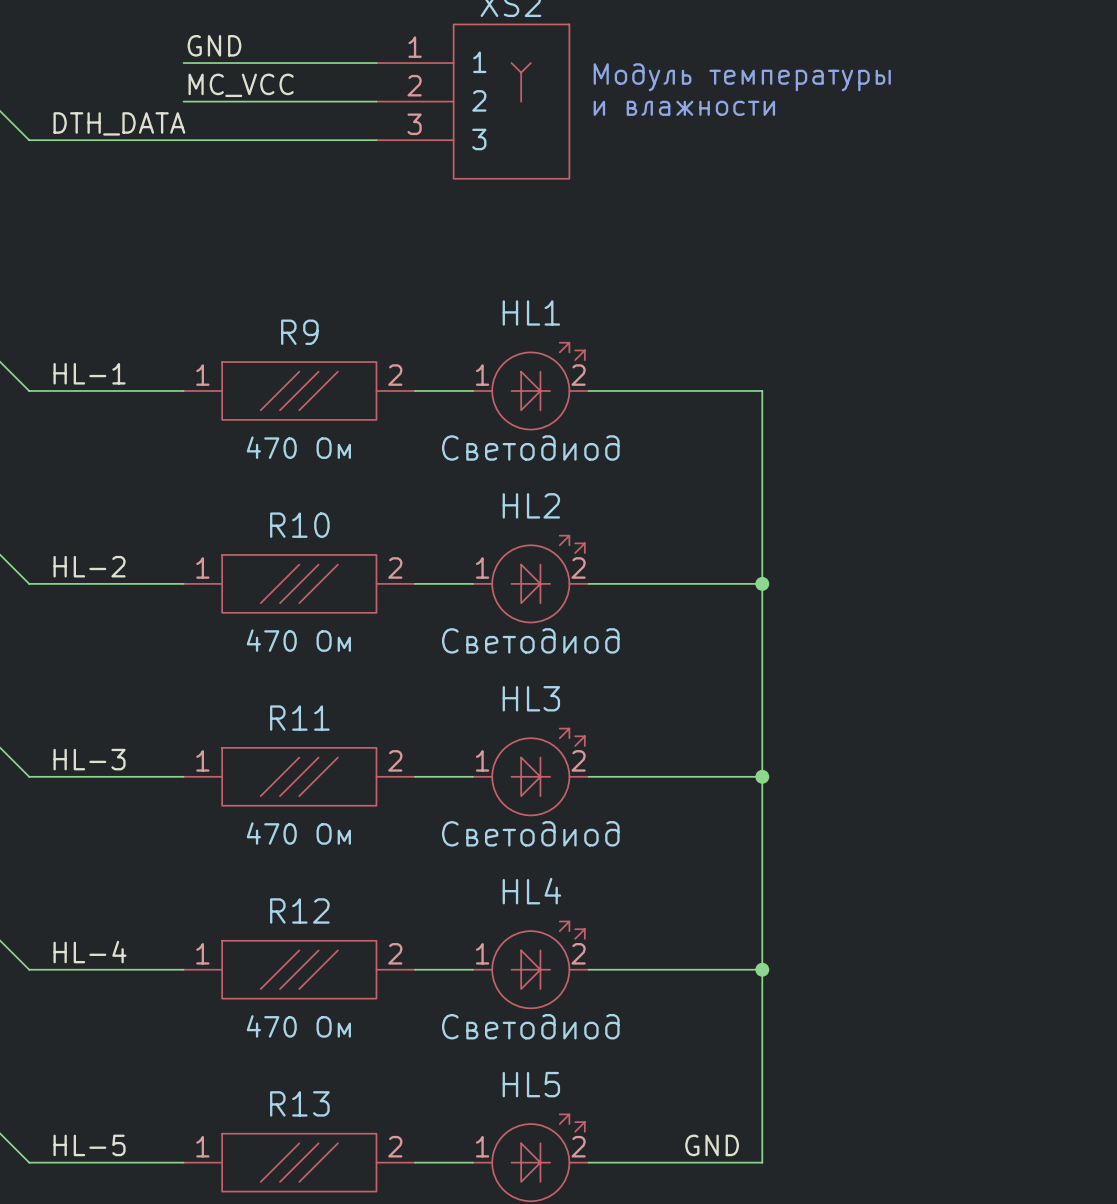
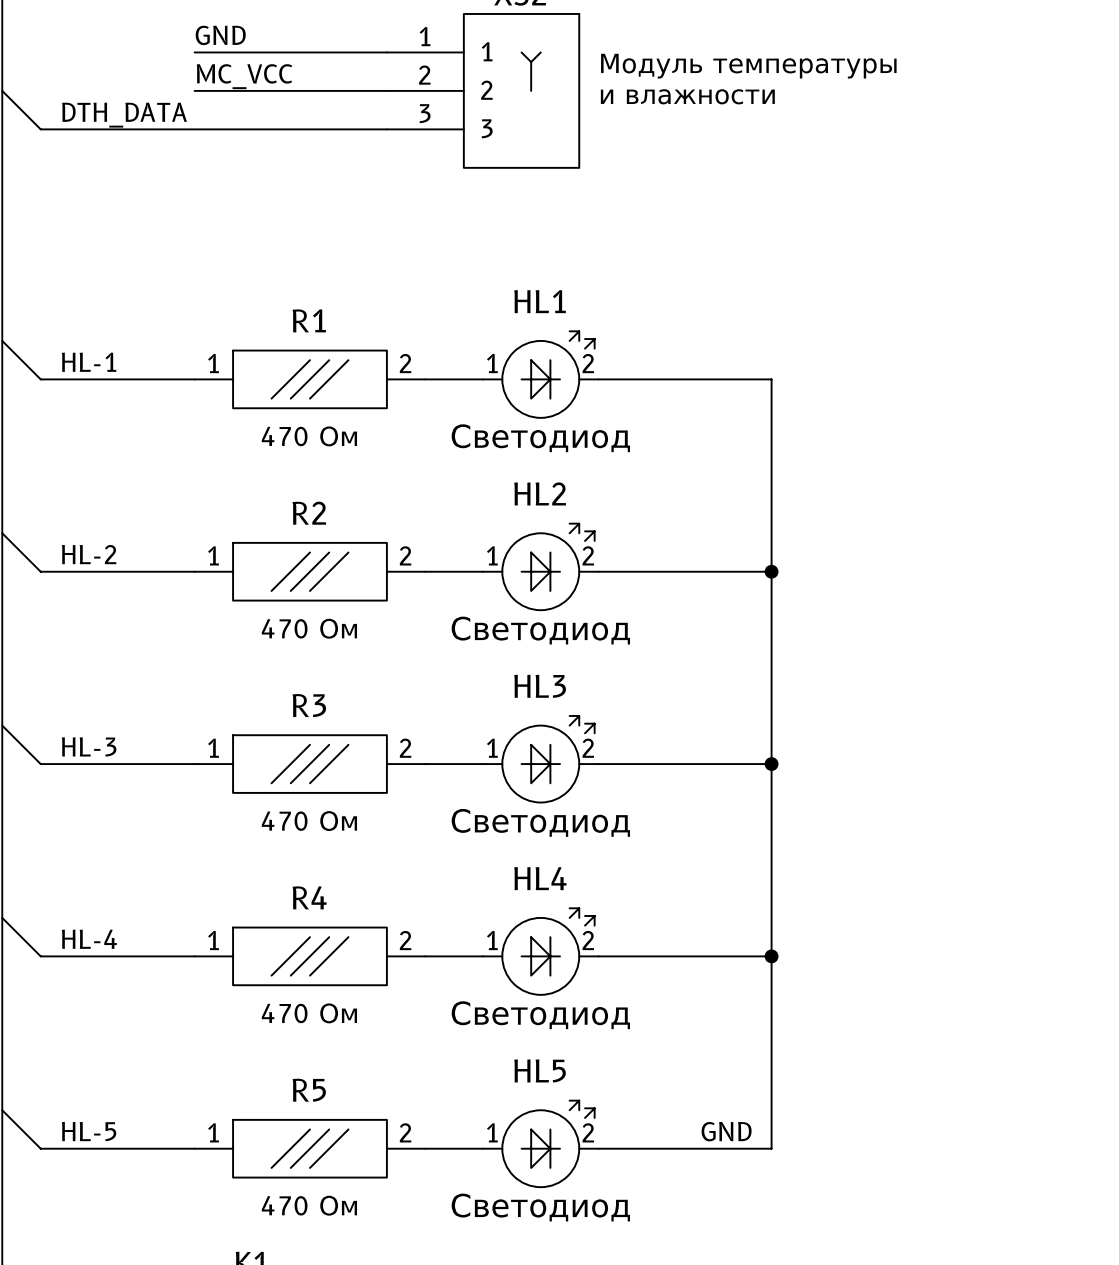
R9 name: R9 (299, 332) -> R1 (309, 320)
R10 name: R10 (299, 525) -> R2 (309, 513)
R11 name: R11 (299, 718) -> R3 (309, 705)
R12 name: R12 (299, 910) -> R4 (309, 897)
R13 name: R13 (299, 1103) -> R5 (309, 1090)

